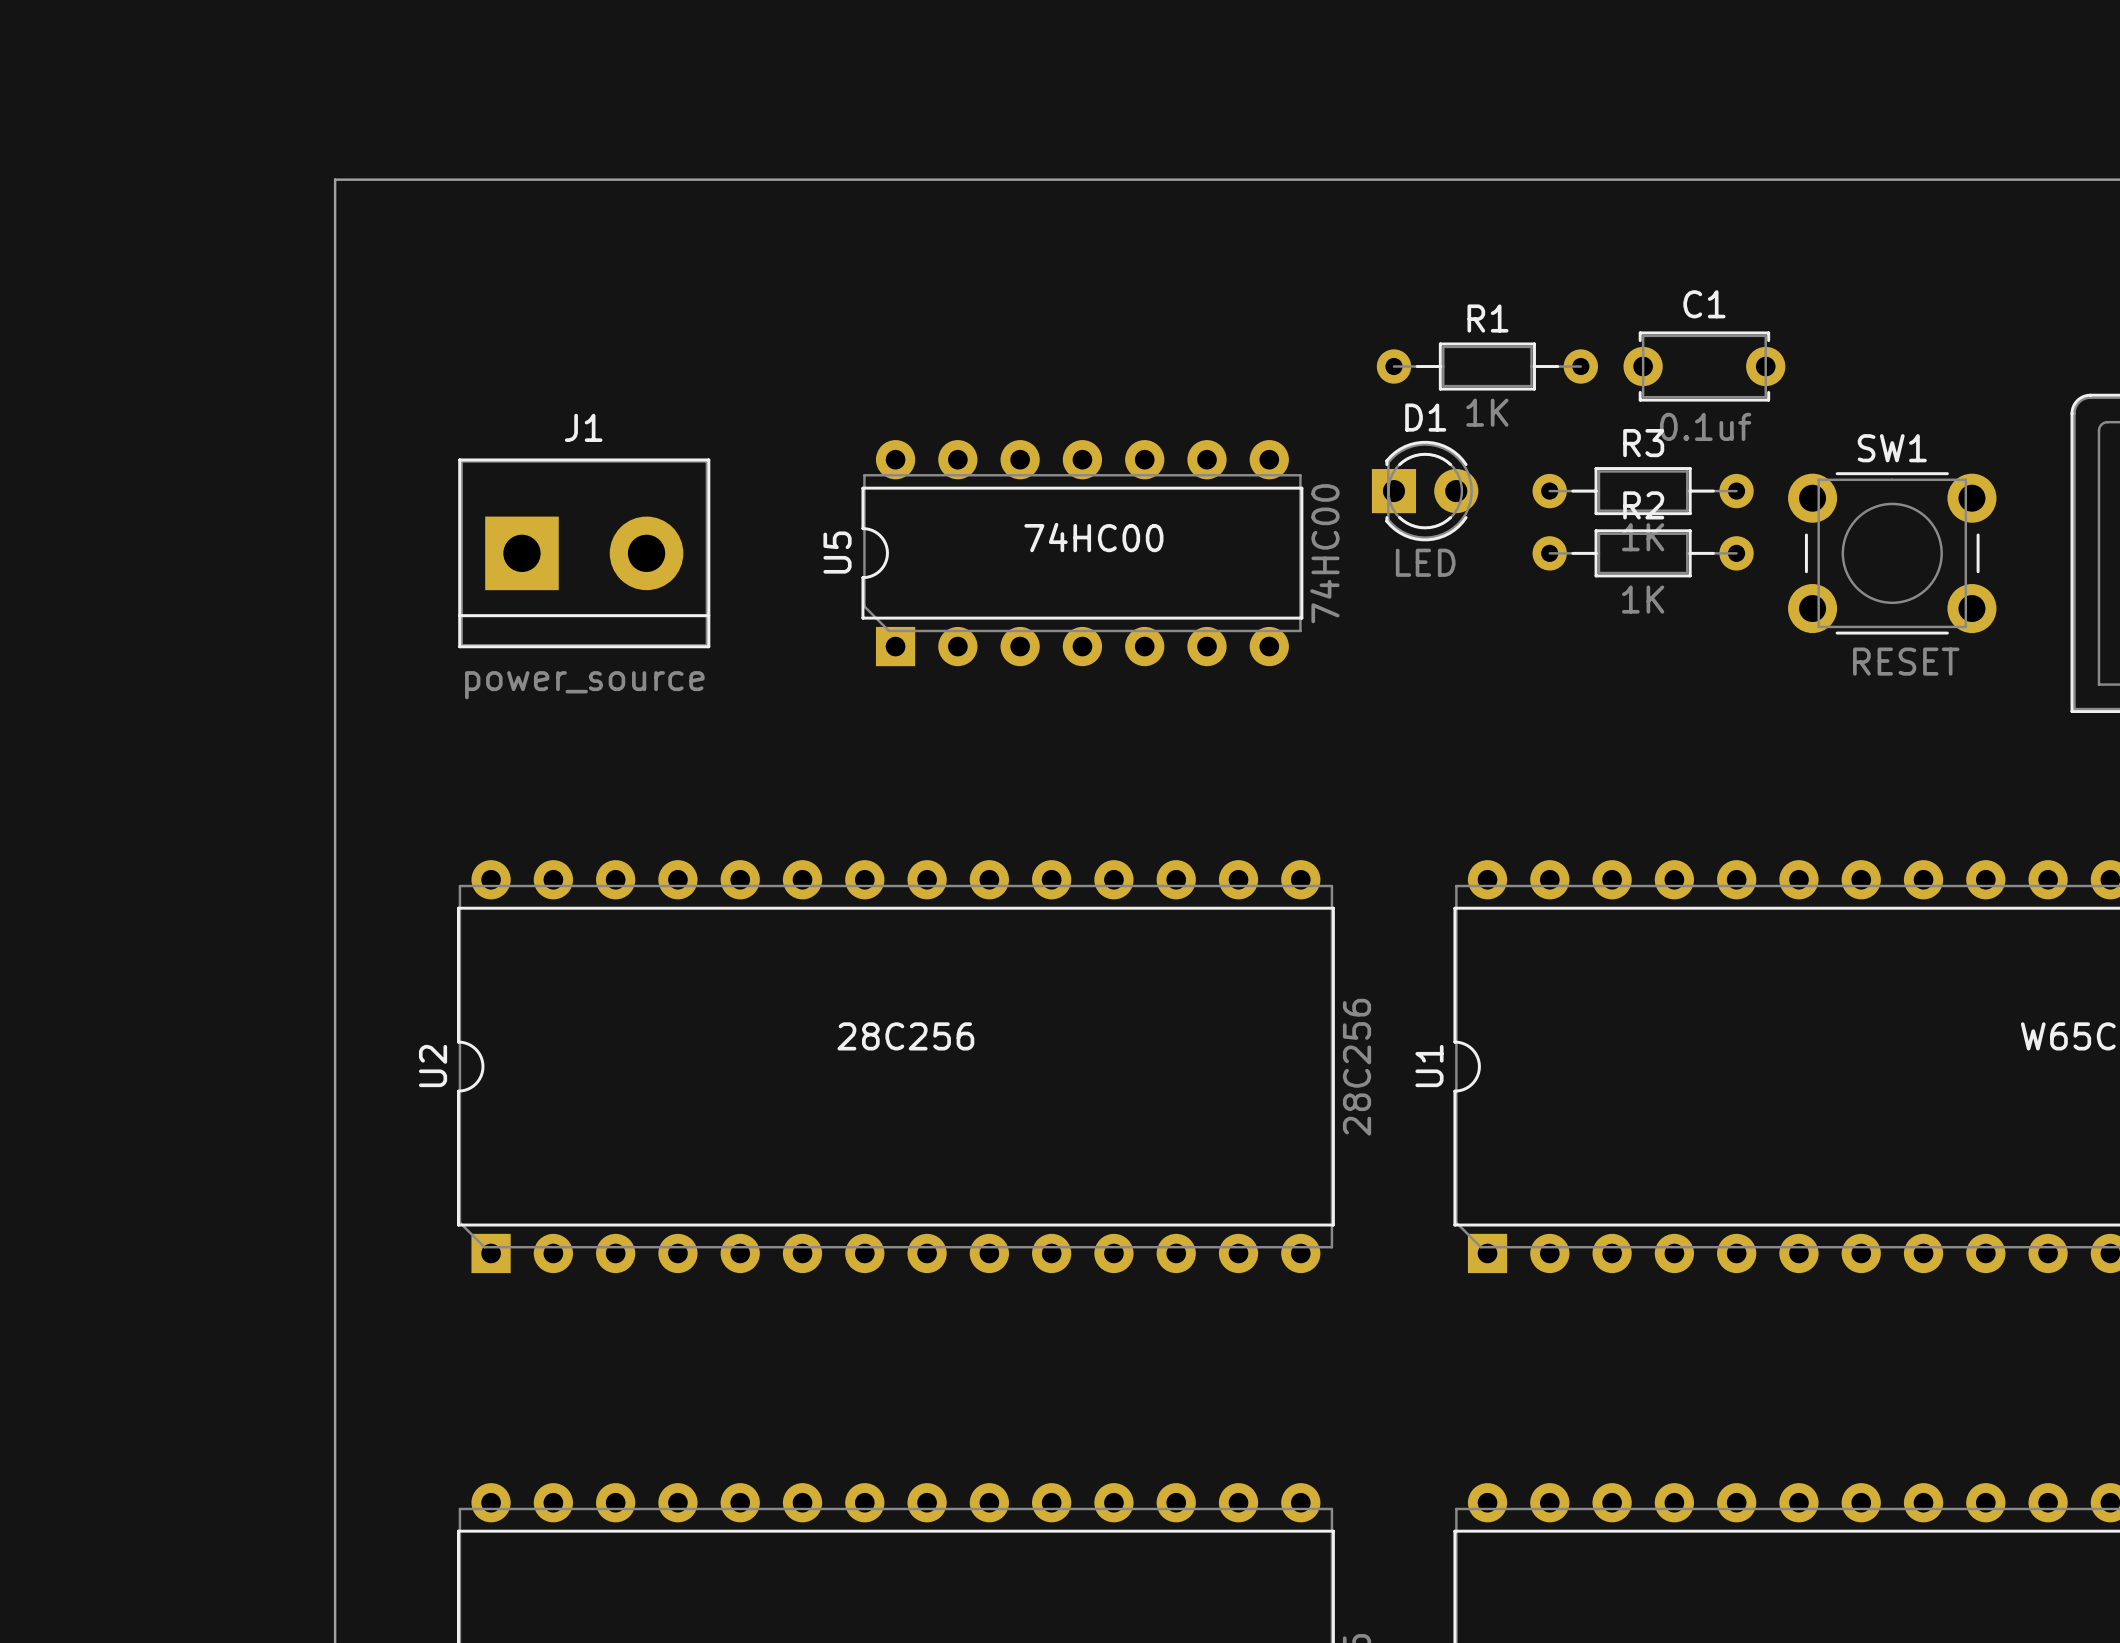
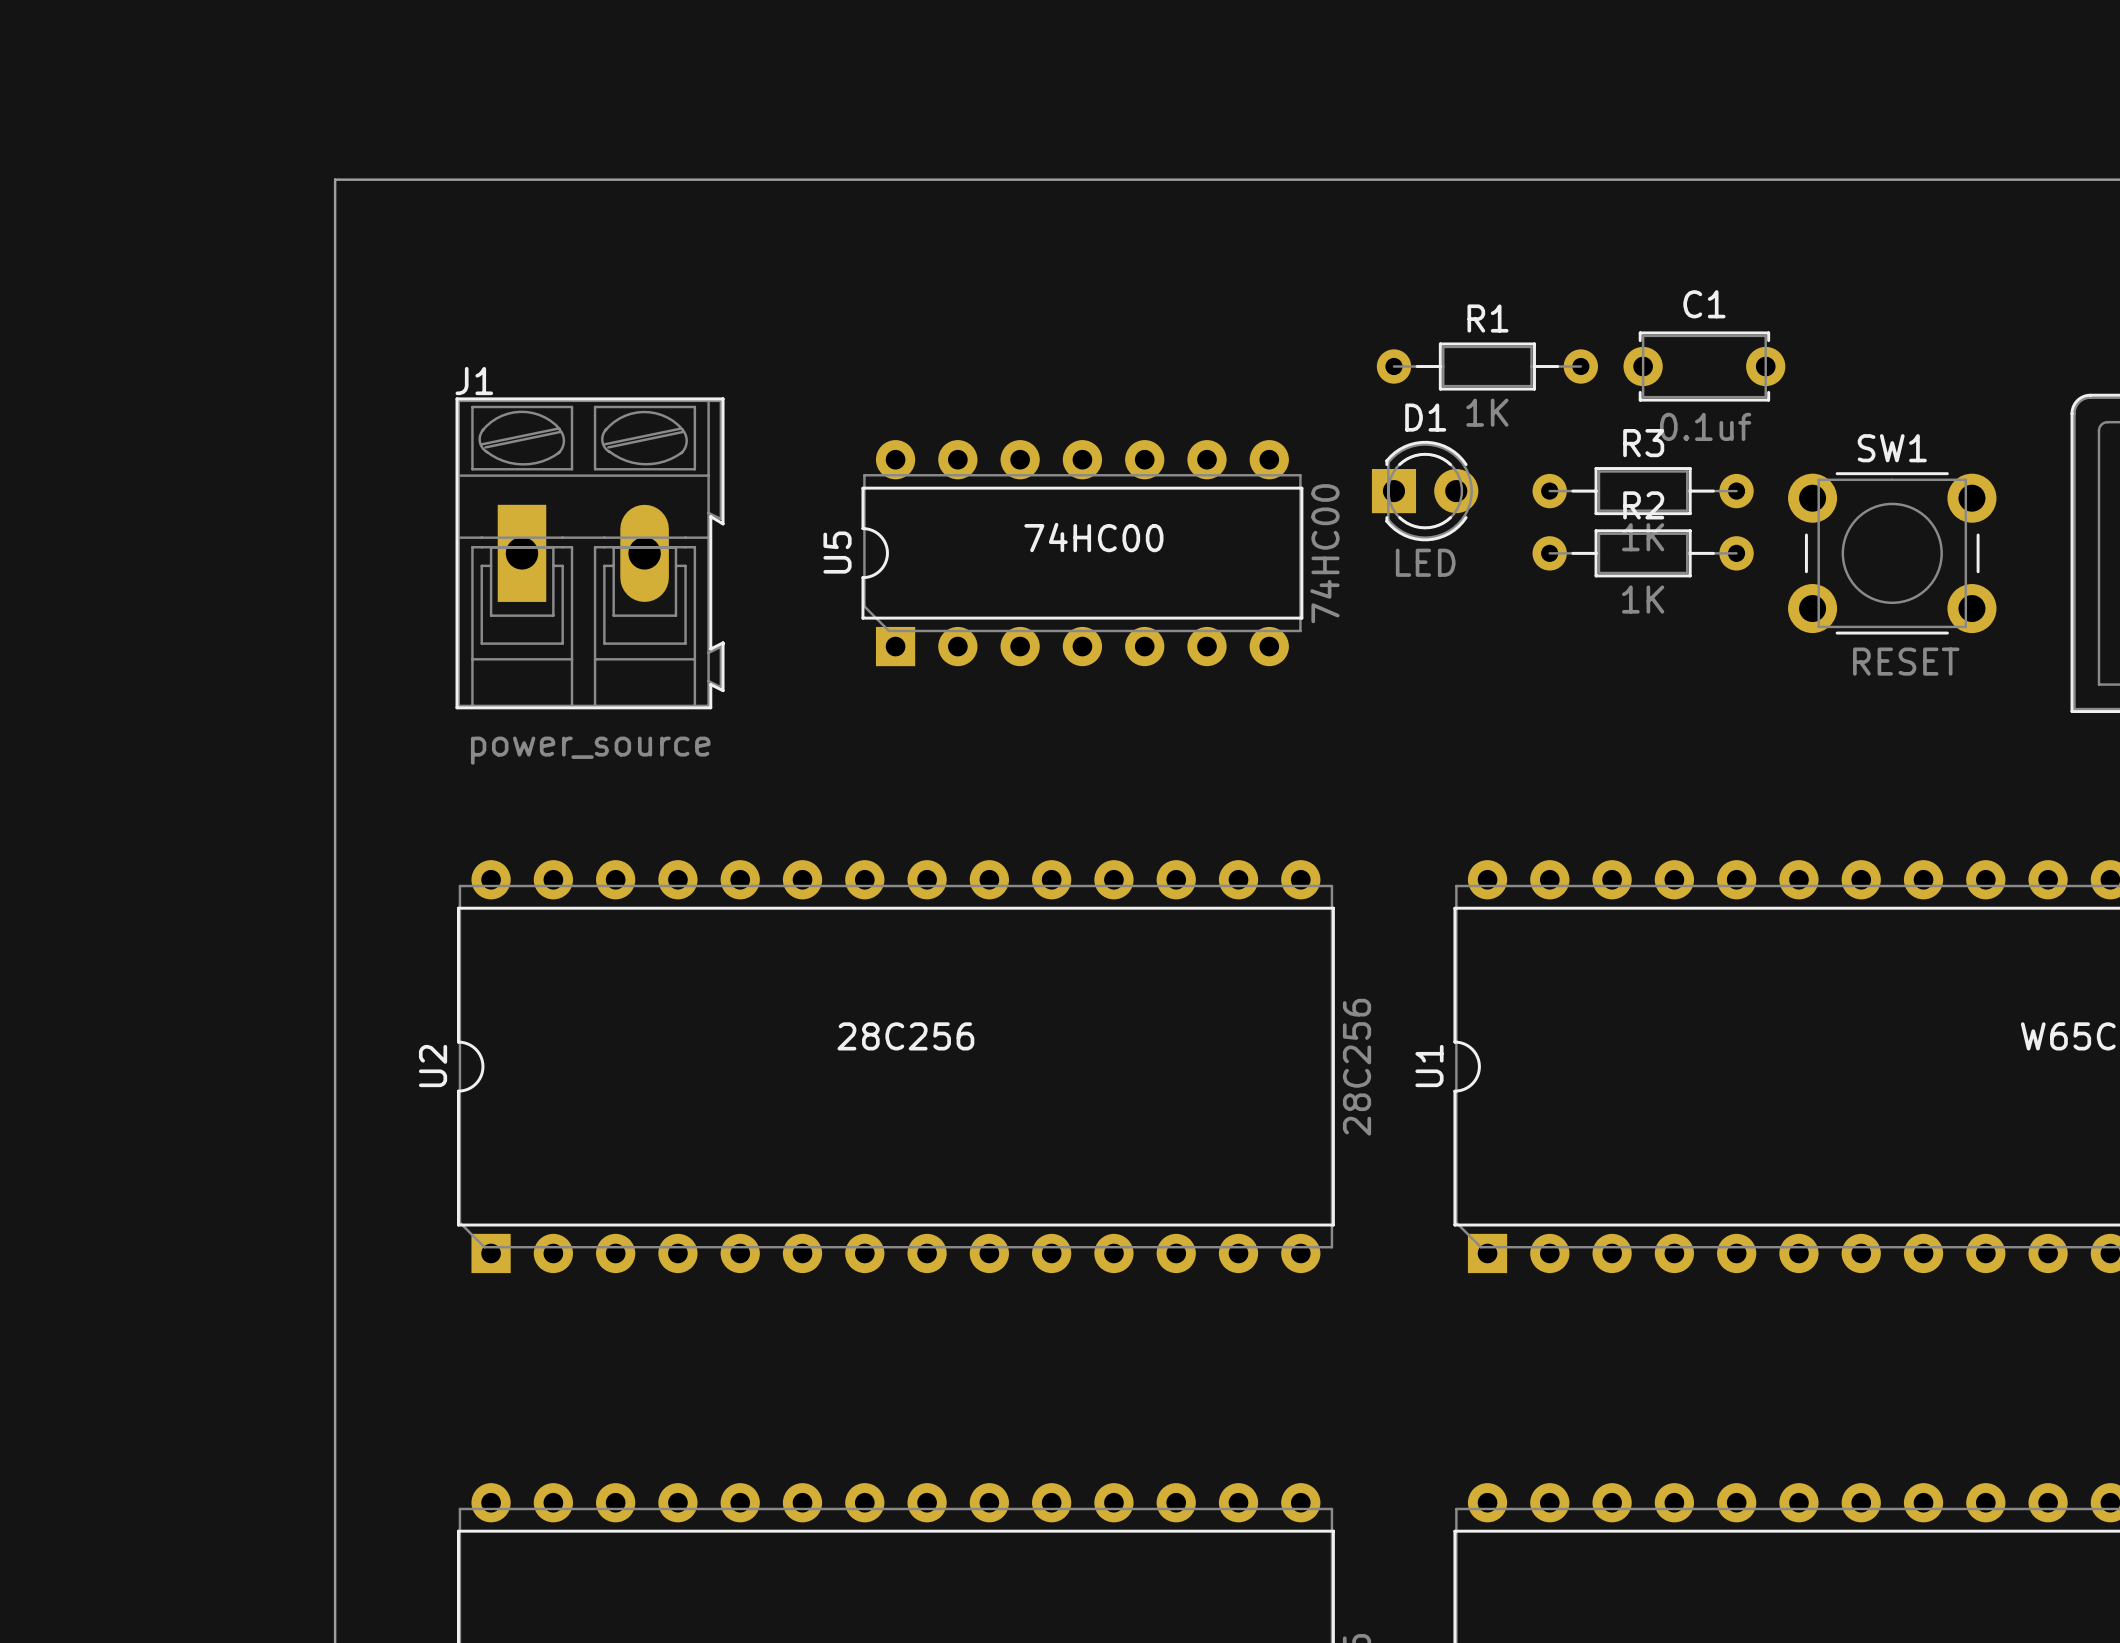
J1 name position: J1 (583, 427) -> J1 (474, 381)
J1 footprint: [458, 458, 711, 649] -> [455, 397, 725, 710]
J1 value position: power_source (584, 685) -> power_source (590, 750)

